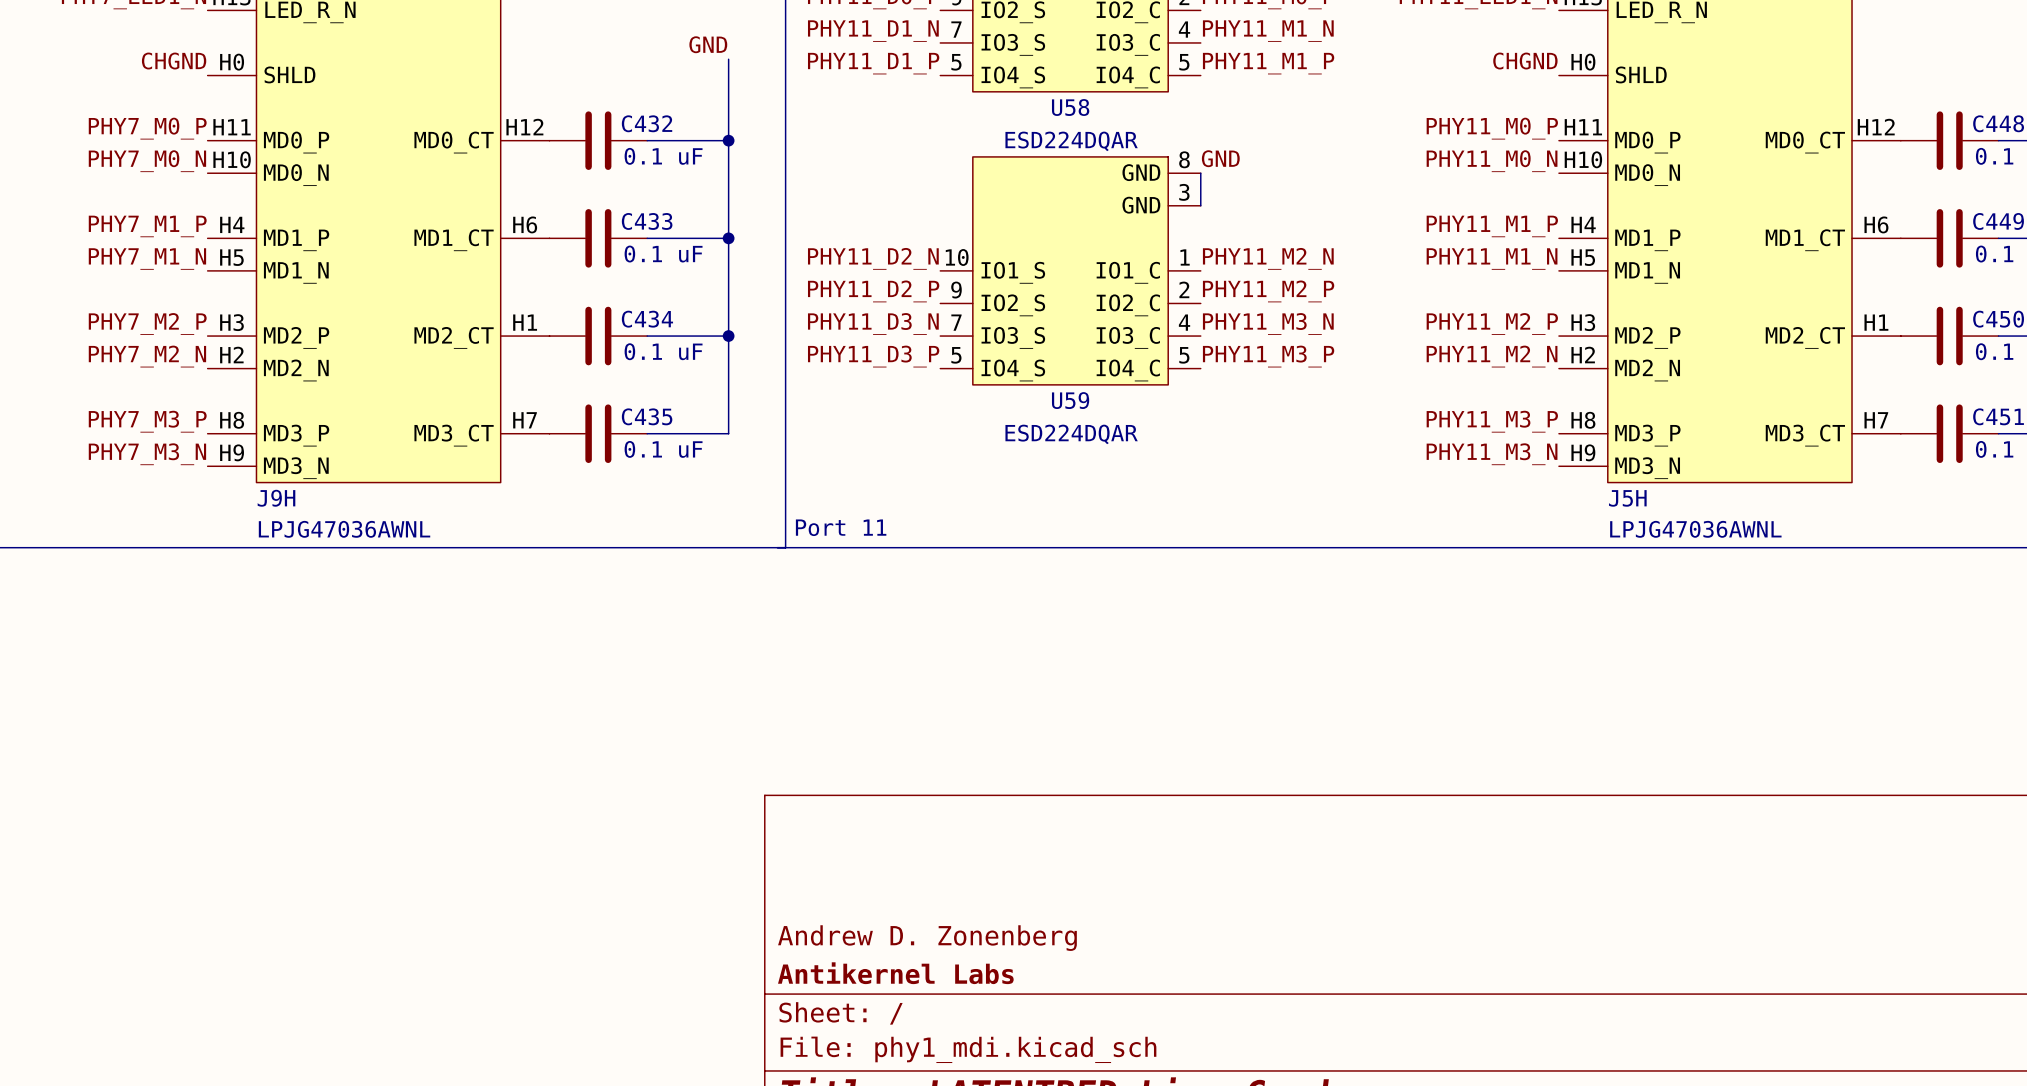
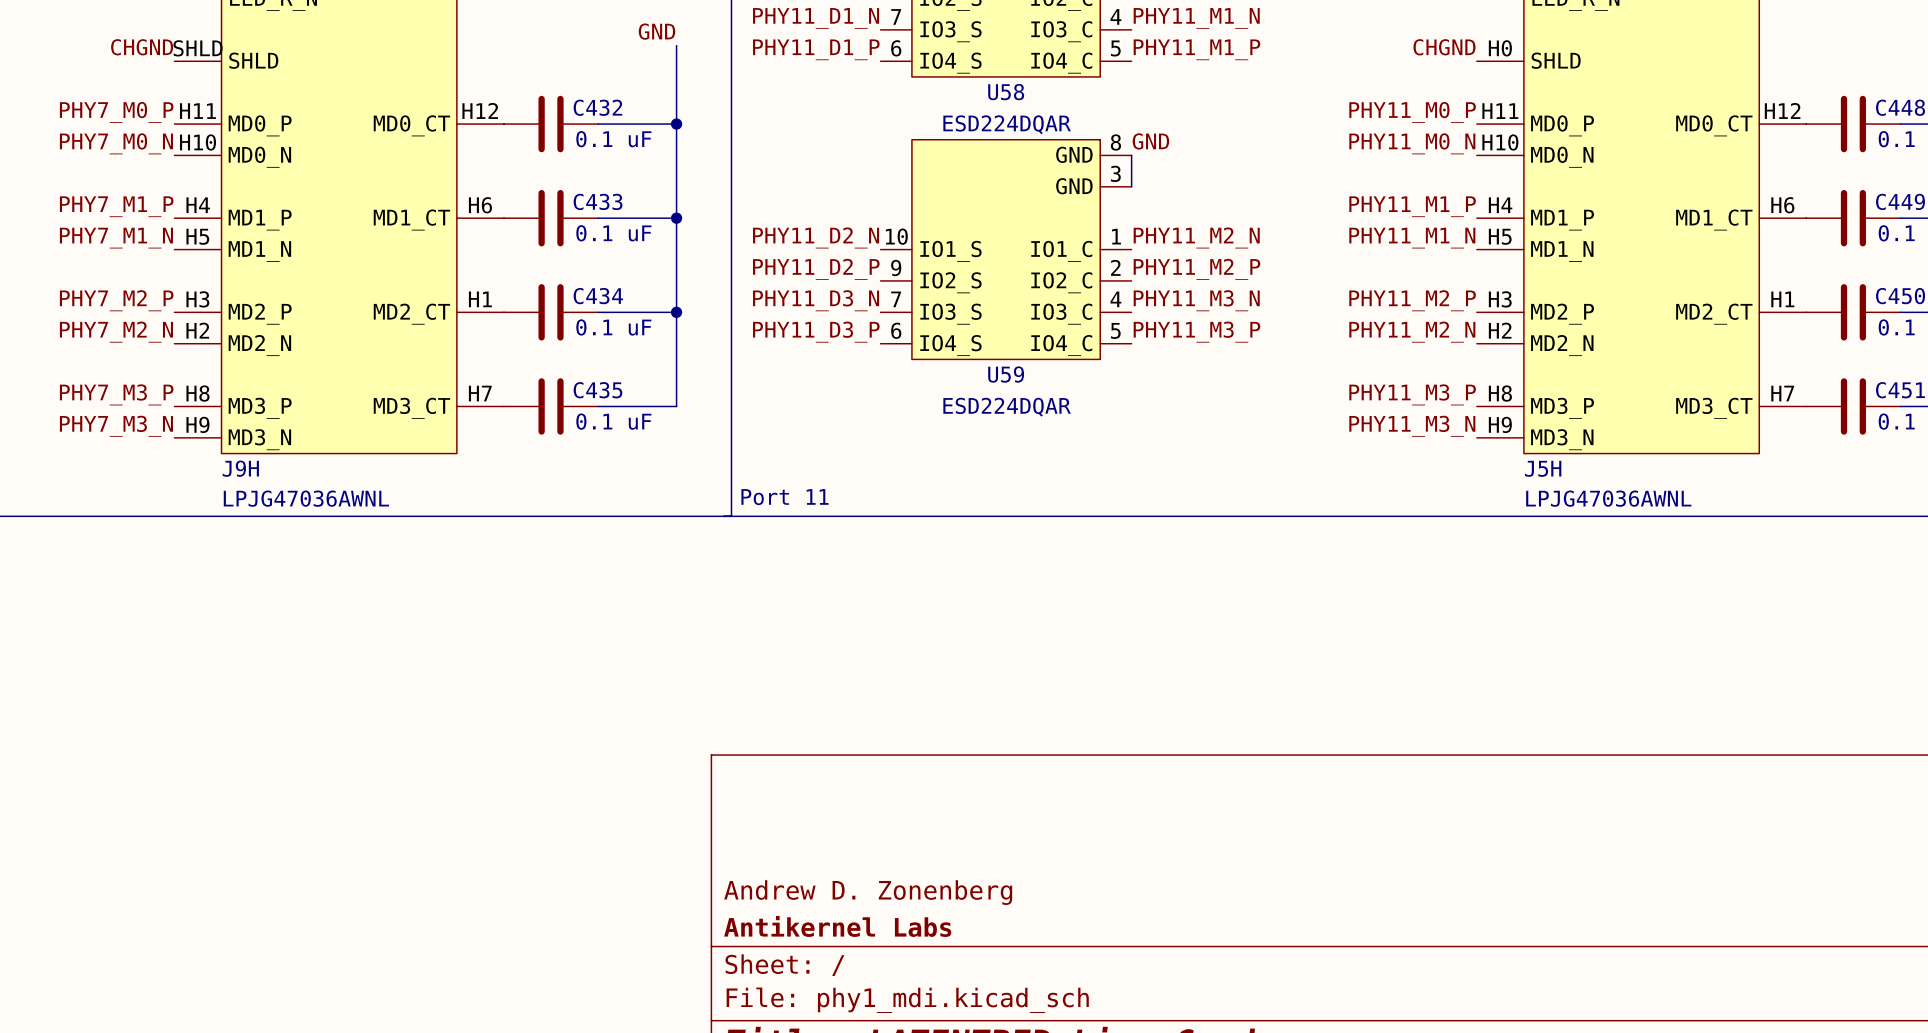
J9H pin number: H0 (232, 62) -> SHLD (198, 48)
U58 pin number: 5 (956, 62) -> 6 (896, 48)
U59 pin number: 5 (956, 355) -> 6 (896, 330)

